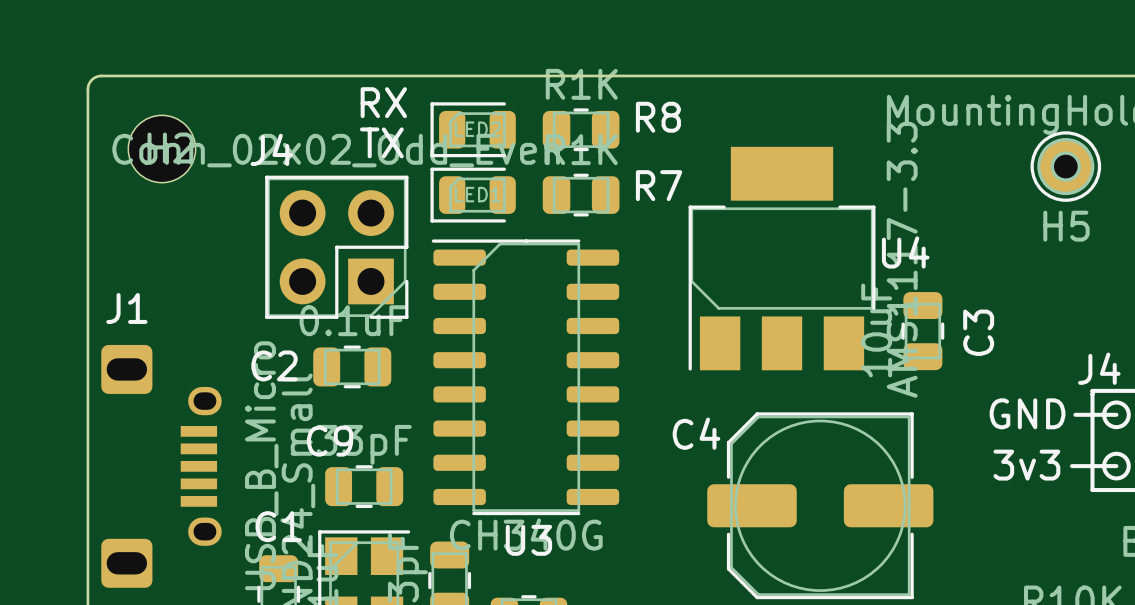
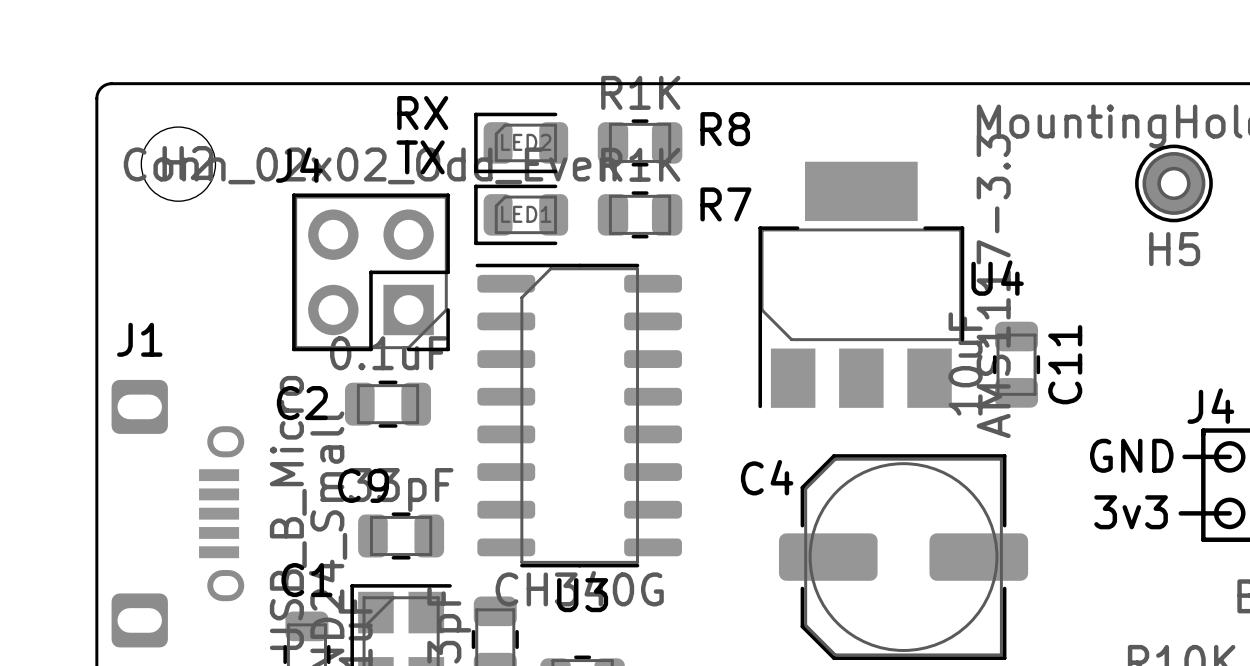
C3 name: C3 (978, 332) -> C11 (1065, 364)

